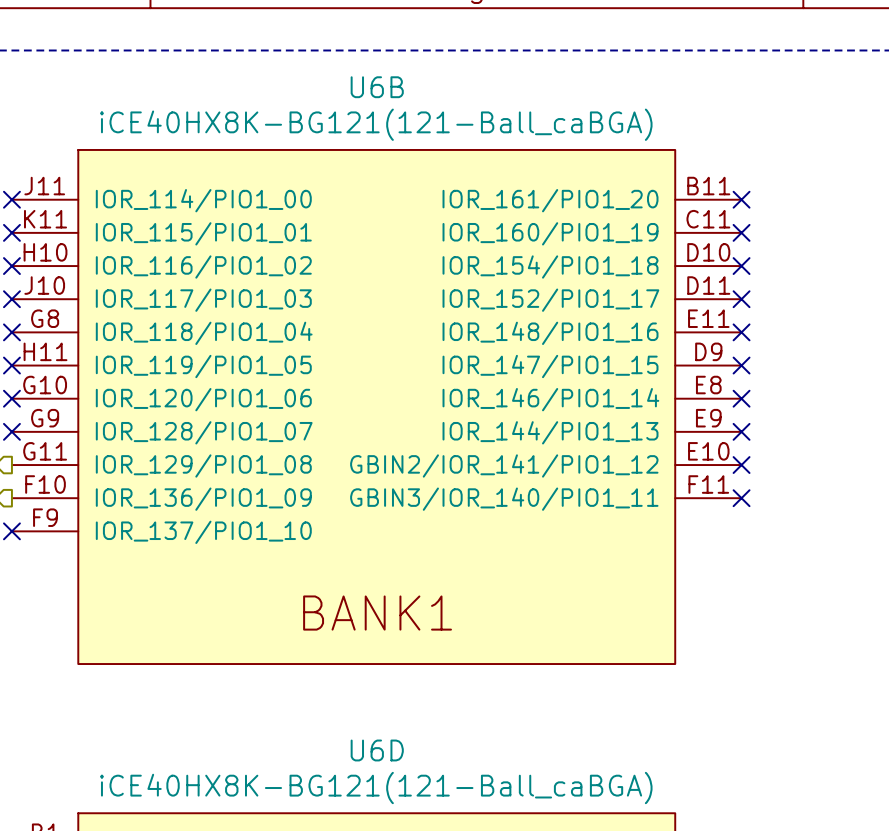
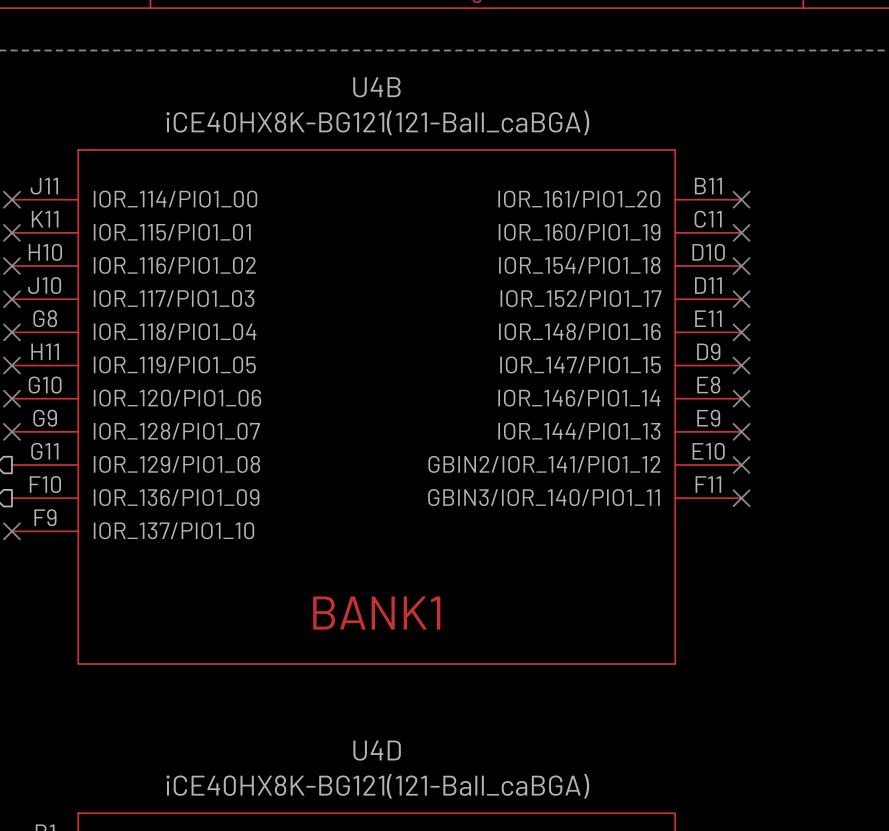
U6B name: U6B (377, 87) -> U4B (376, 87)
U6D name: U6D (377, 750) -> U4D (377, 750)

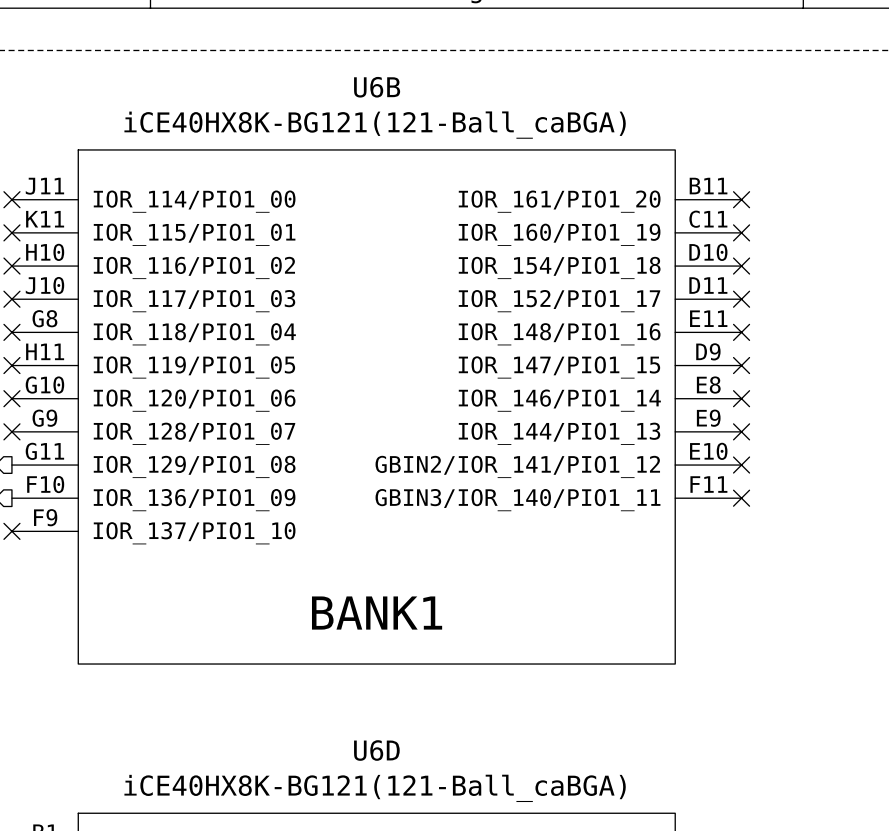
U4B name: U4B (376, 87) -> U6B (377, 87)
U4D name: U4D (377, 750) -> U6D (376, 750)

